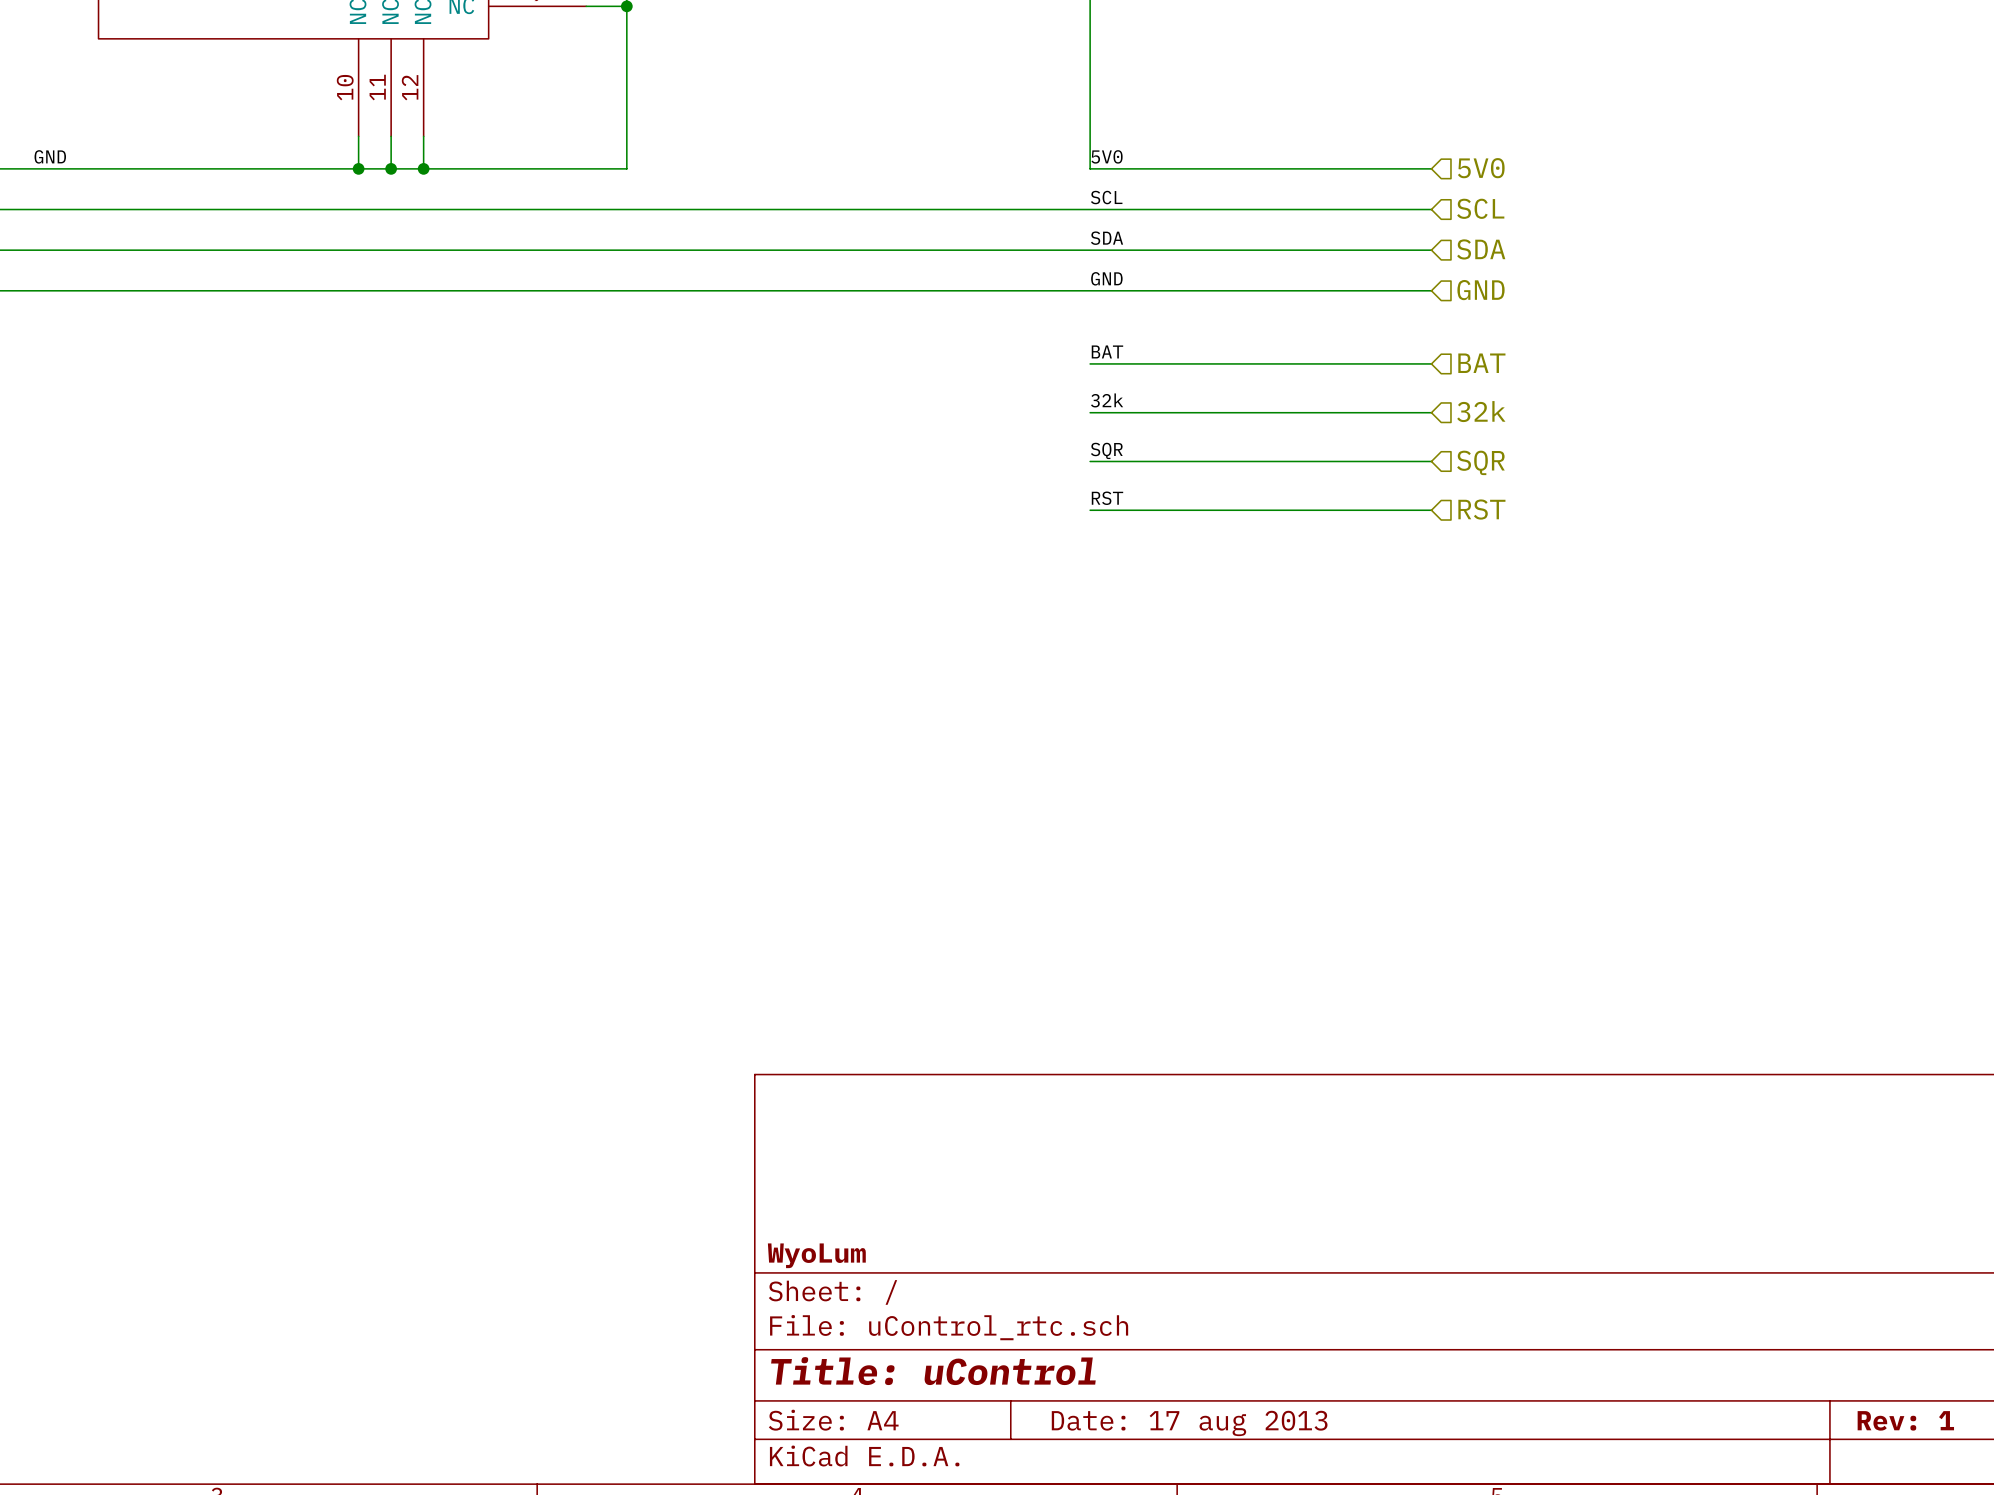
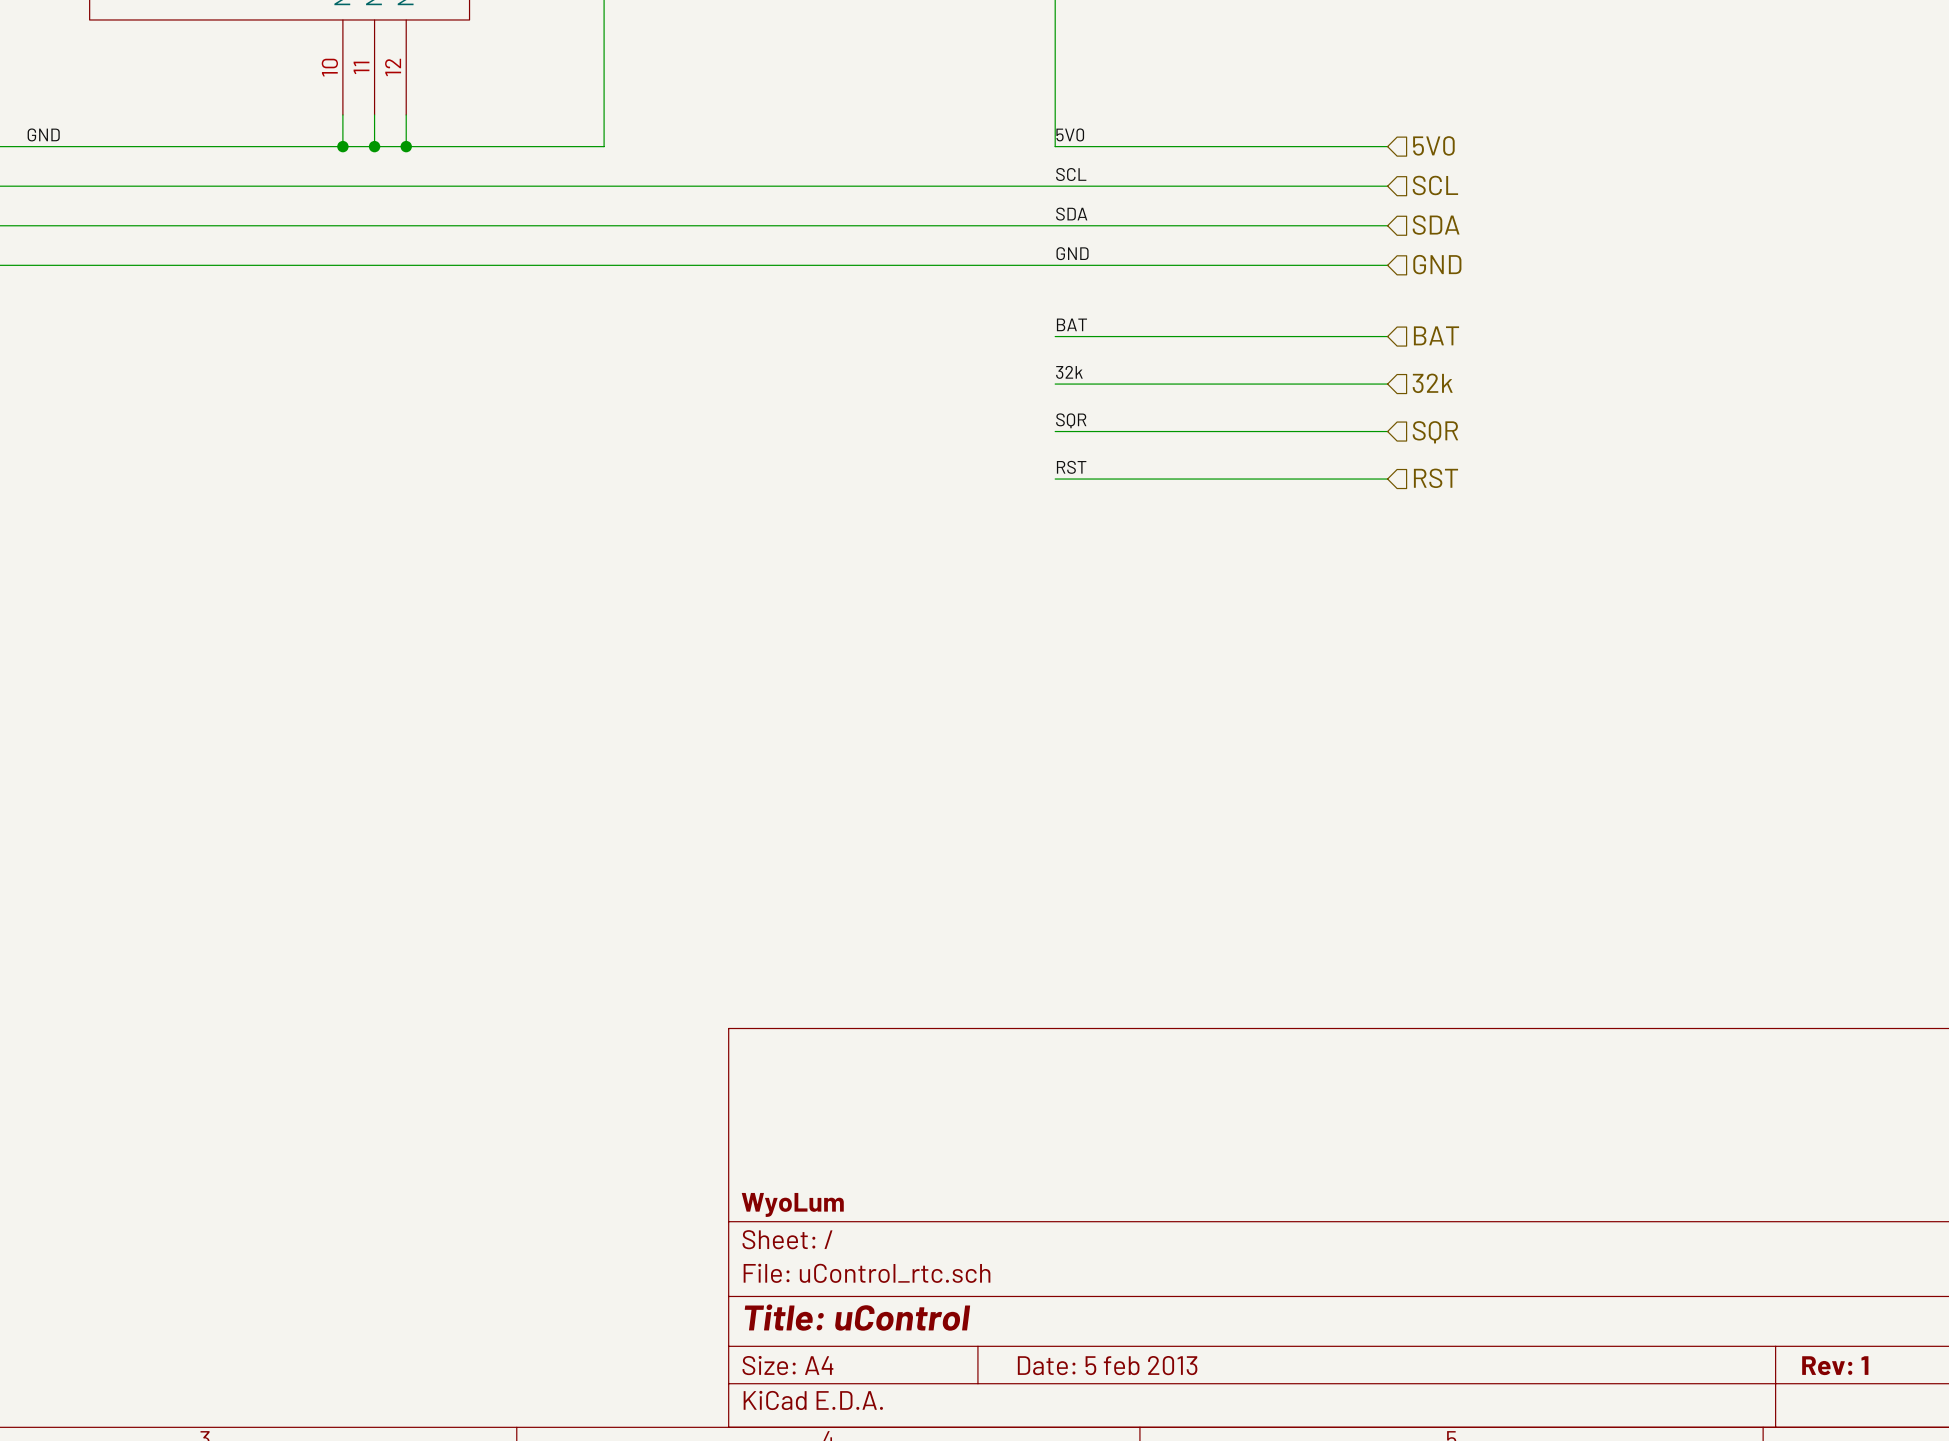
title block: Date: 17 aug 2013 (1189, 1423) -> Date: 5 feb 2013 (1107, 1365)

